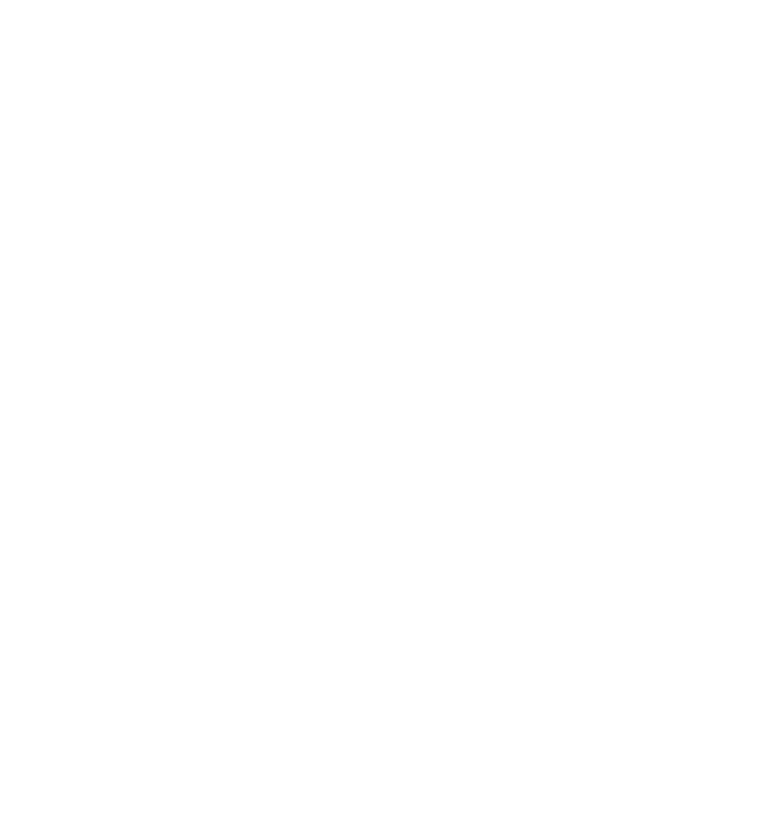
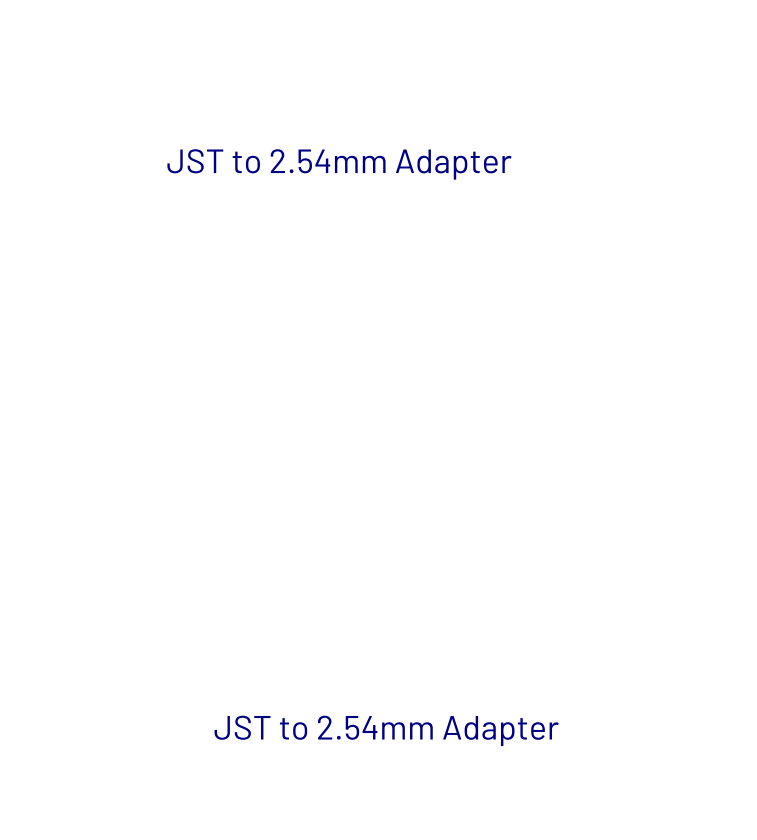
text: none -> JST to 2.54mm Adapter (339, 164)
text: none -> JST to 2.54mm Adapter (386, 730)

